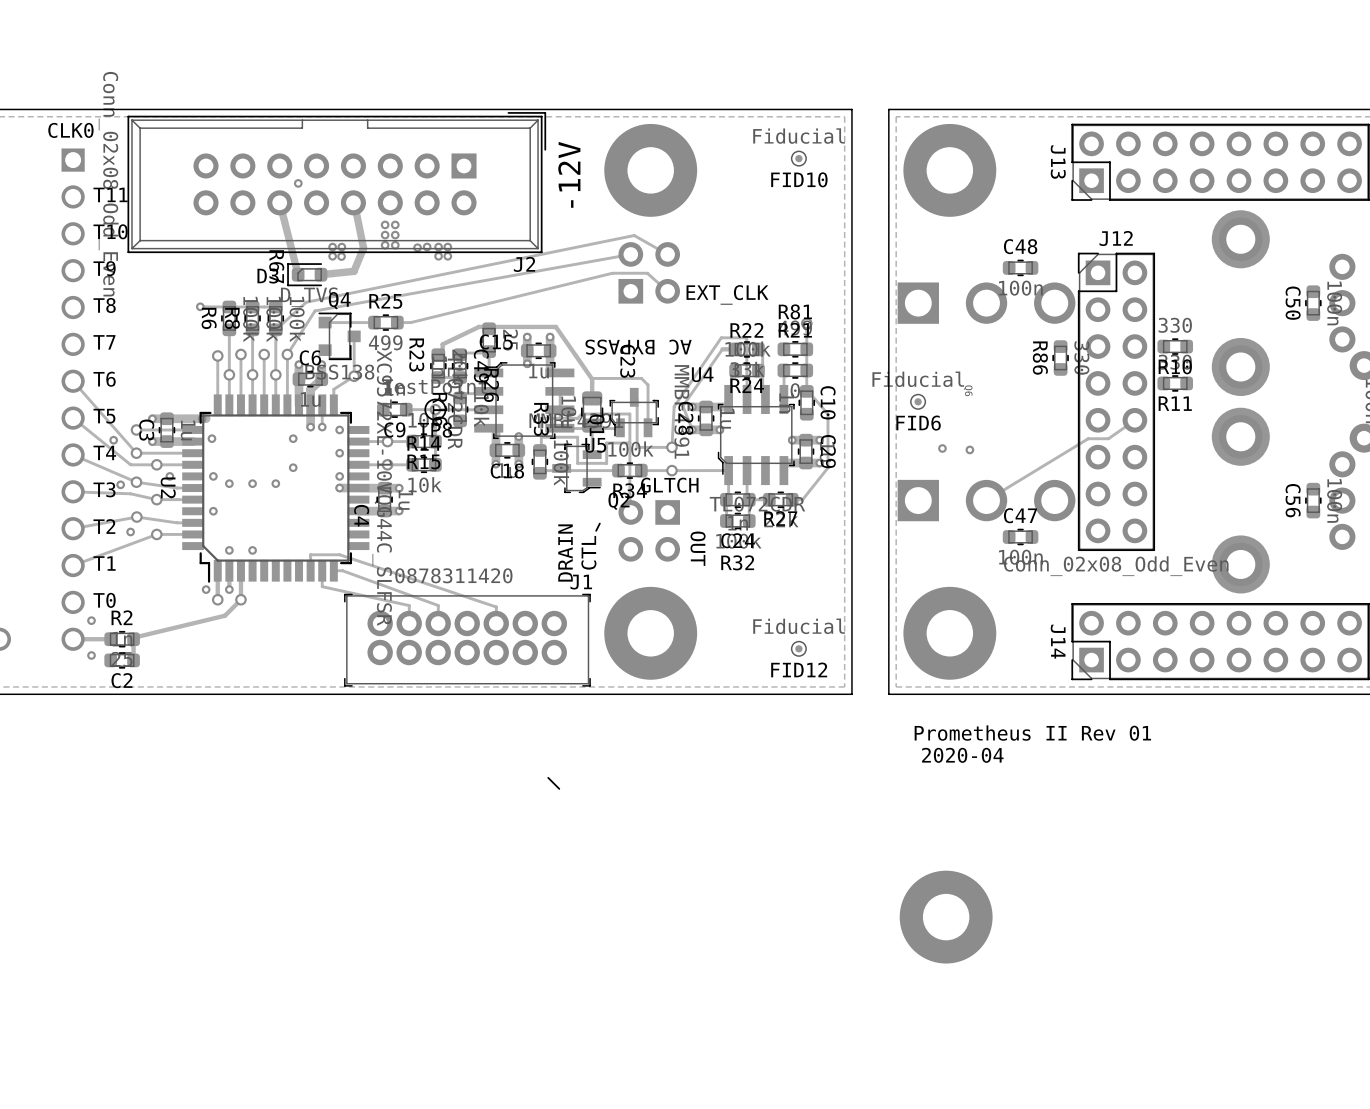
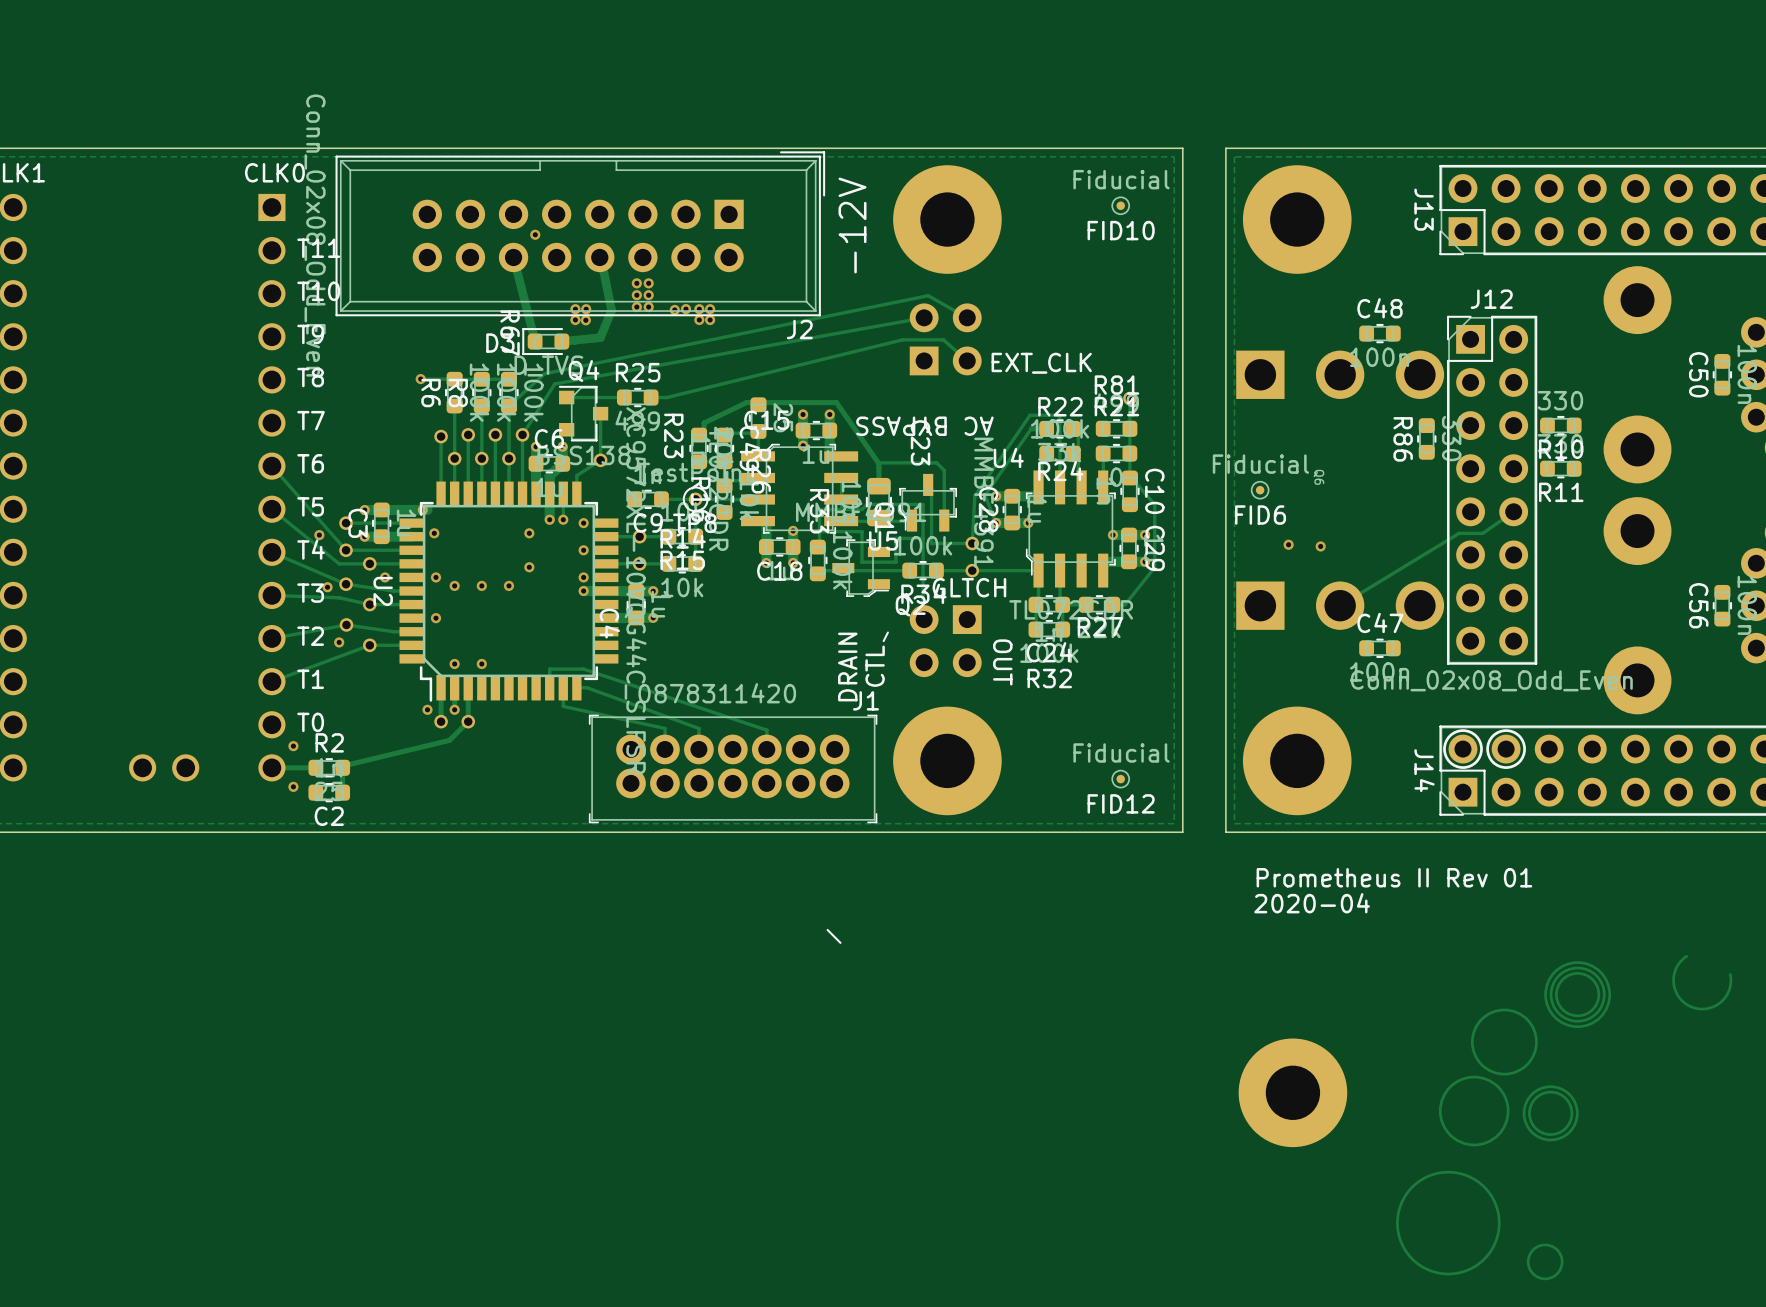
drawing: none -> [1443, 729, 1526, 769]
track: none -> (1686, 956) (1676, 966) (1673, 981) (1679, 998) (1691, 1006) (1705, 1008) (1719, 1003) (1729, 989) (1730, 974)
drawing: none -> [1438, 961, 1612, 1147]
drawing: none -> [1396, 1170, 1501, 1276]
drawing: none -> [1526, 1243, 1564, 1281]

